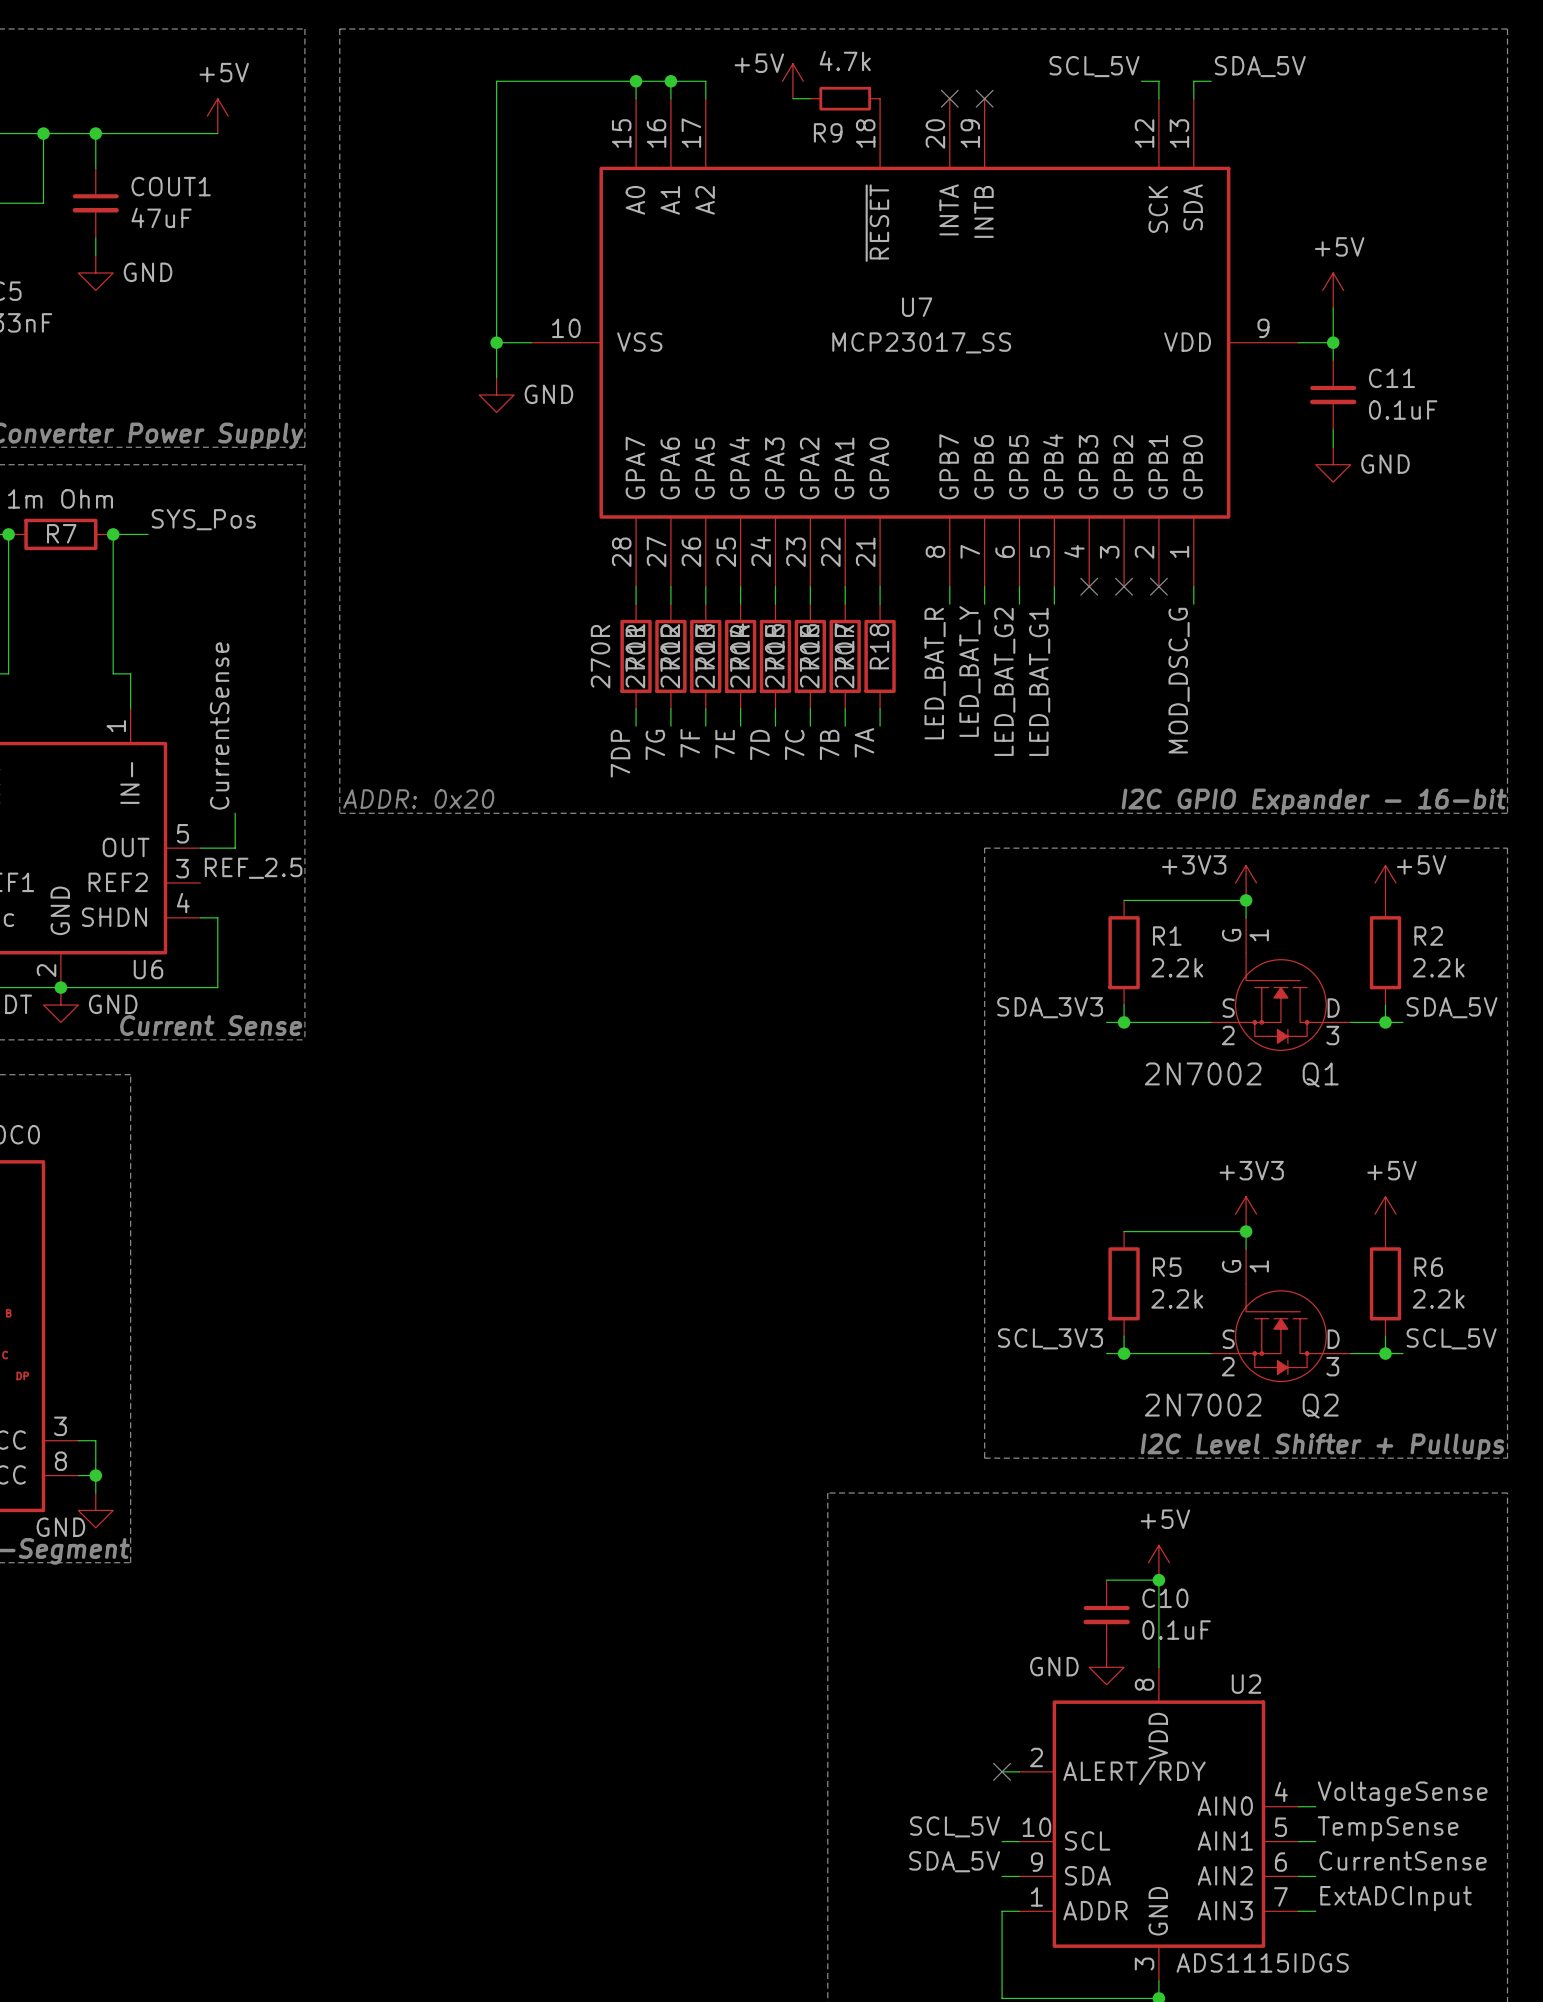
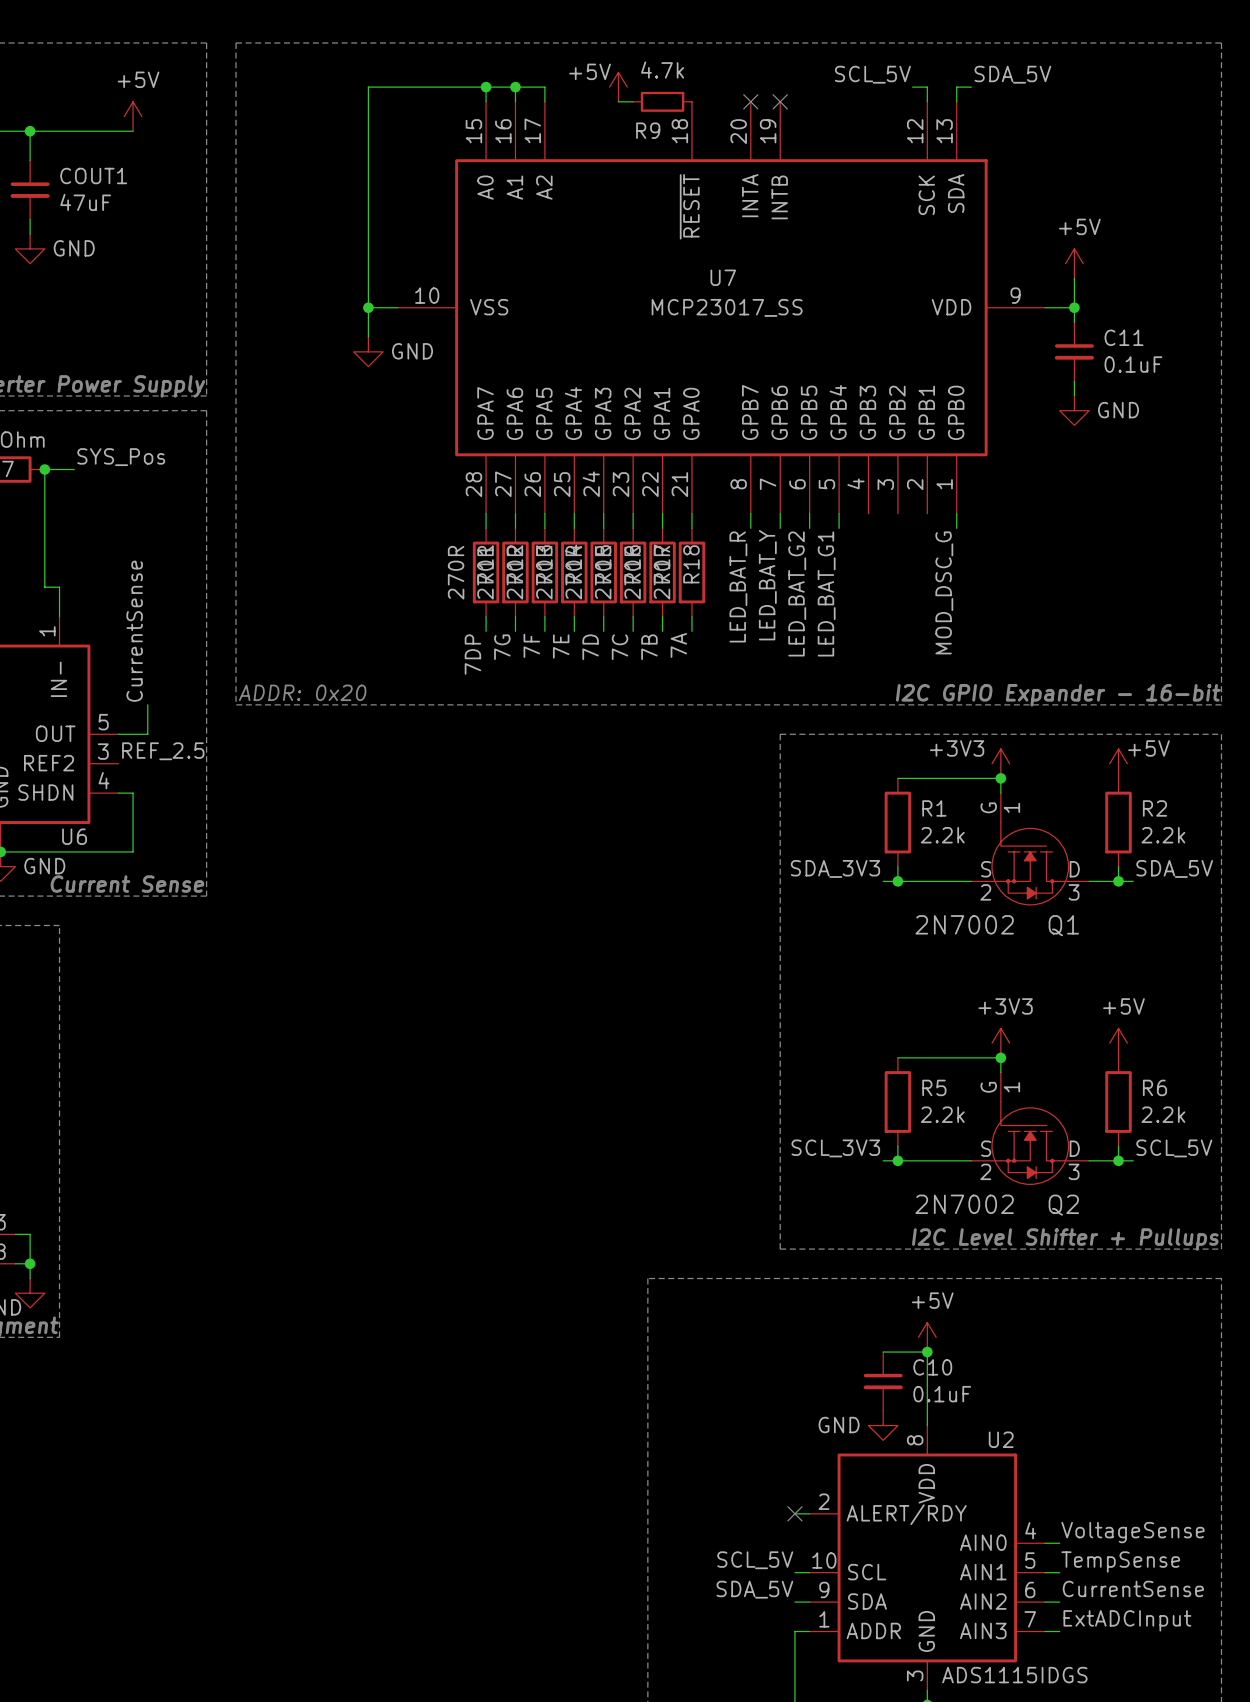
no-connect mark: (1089, 586) -> none
no-connect mark: (1124, 586) -> none
no-connect mark: (1158, 586) -> none

